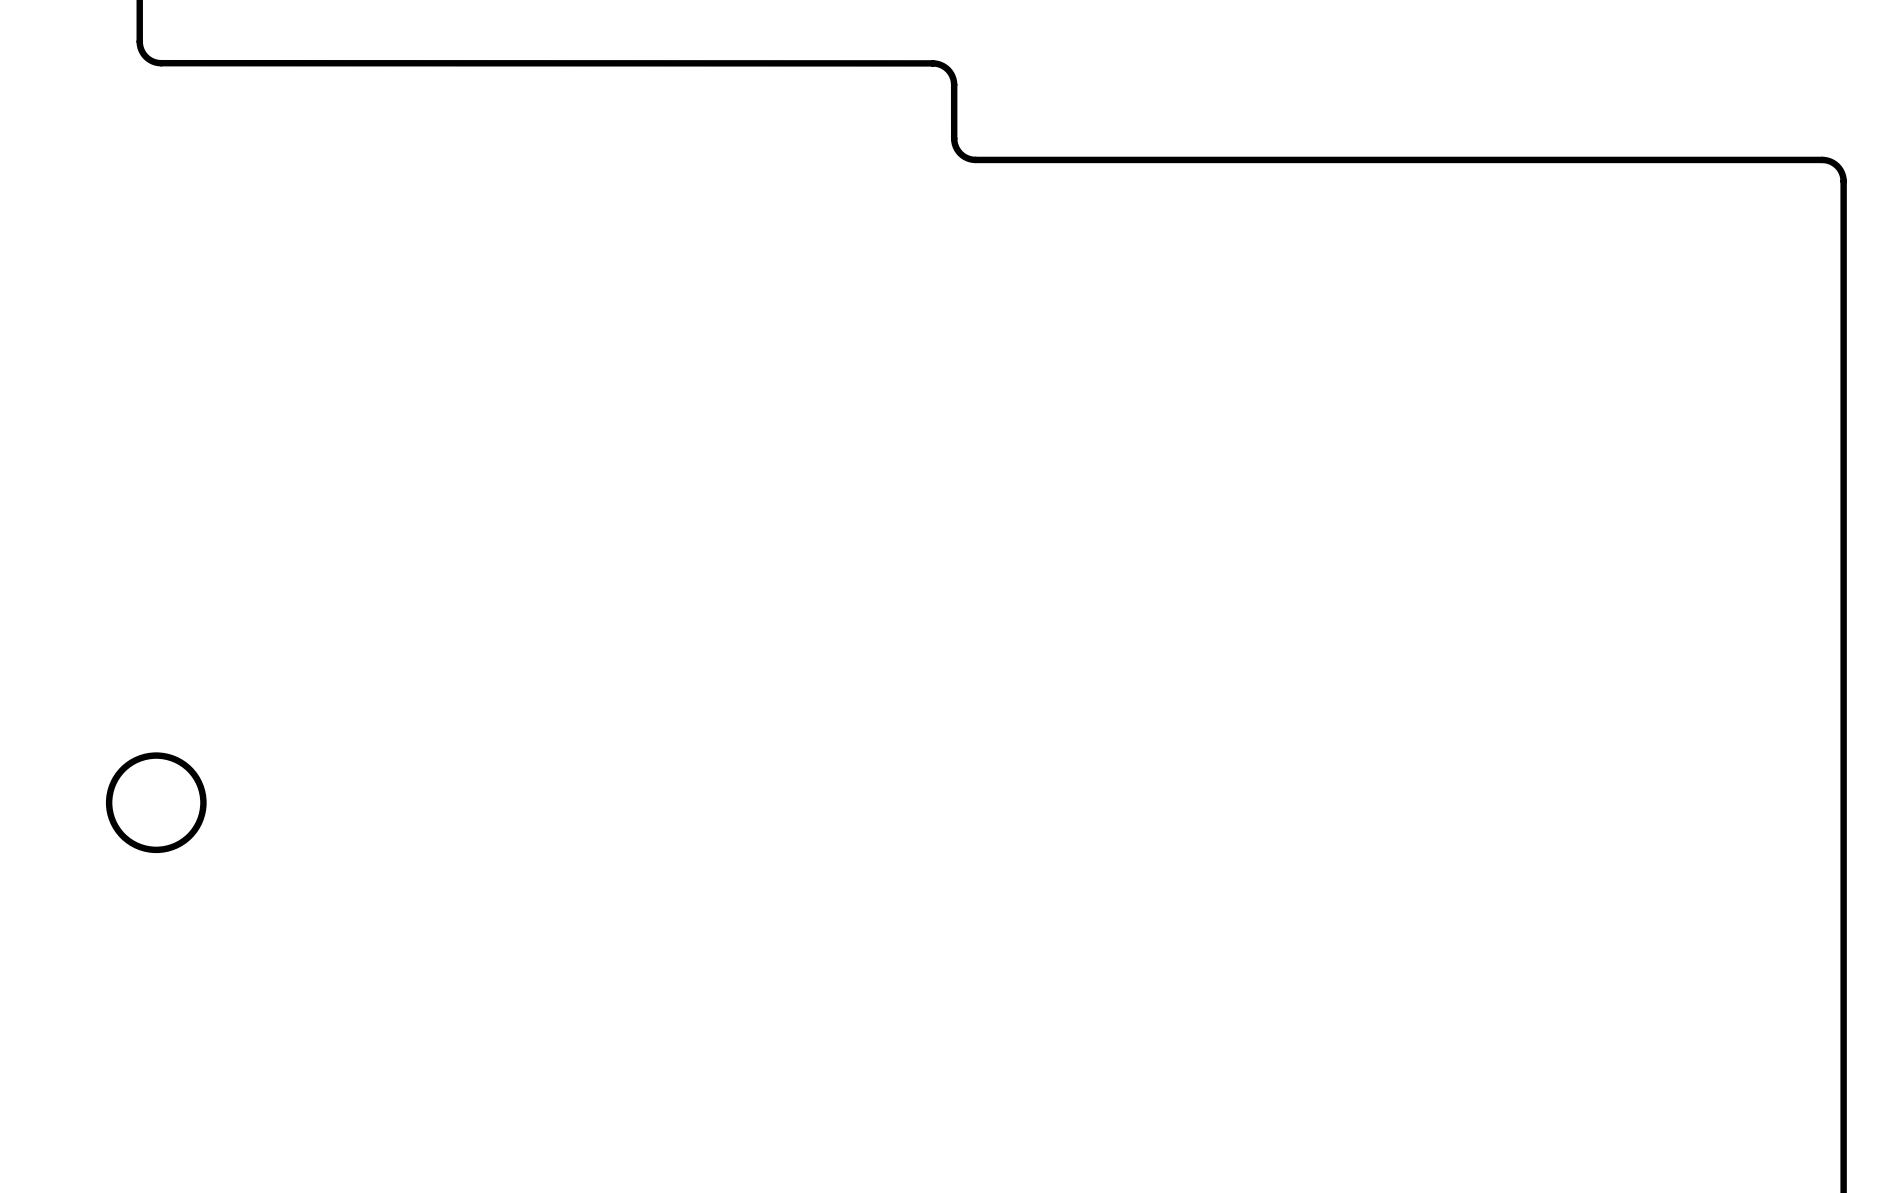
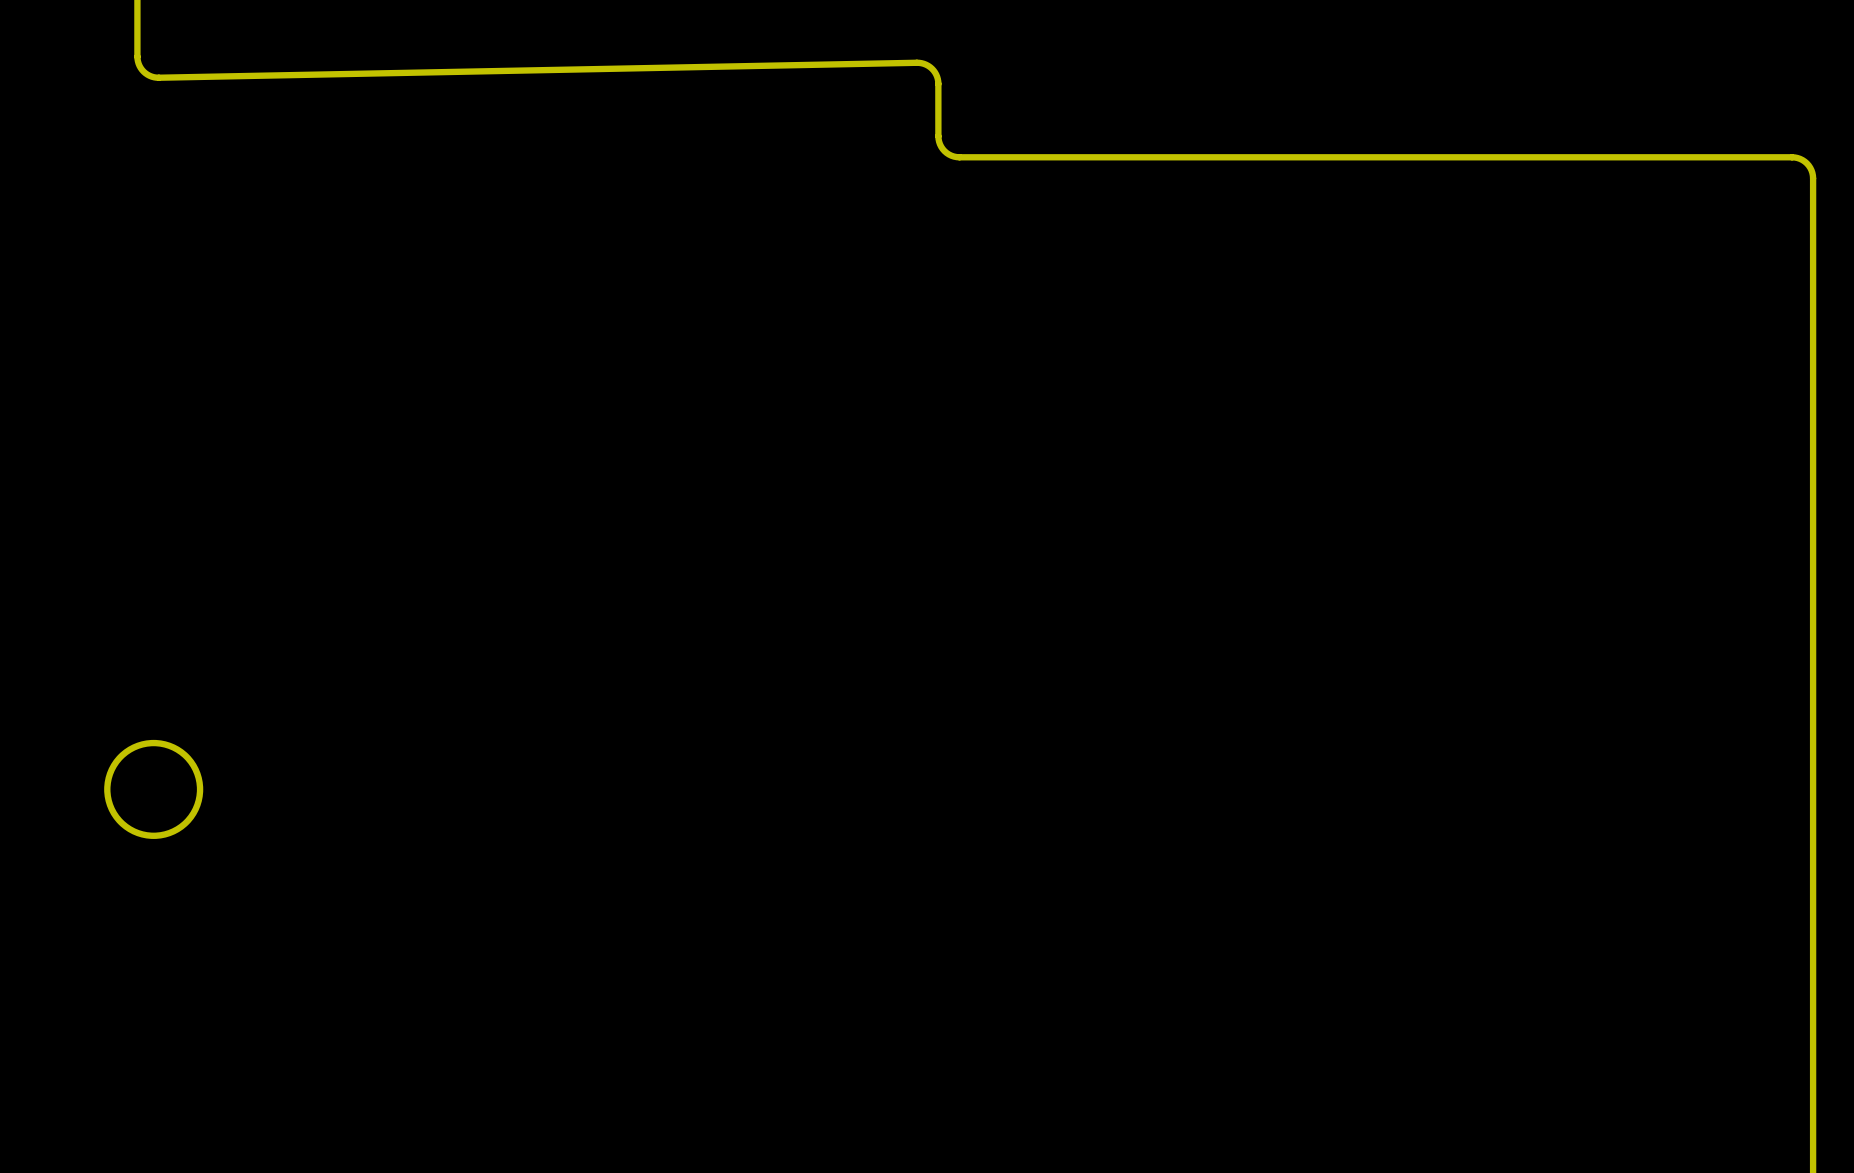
board edge: (139, 41) (141, 49) (146, 56) (152, 61) (161, 63) (932, 63) (940, 65) (947, 69) (952, 76) (954, 84) -> (137, 41) (139, 65) (147, 74) (156, 77) (916, 62) (923, 63) (932, 68) (936, 74) (938, 83)

